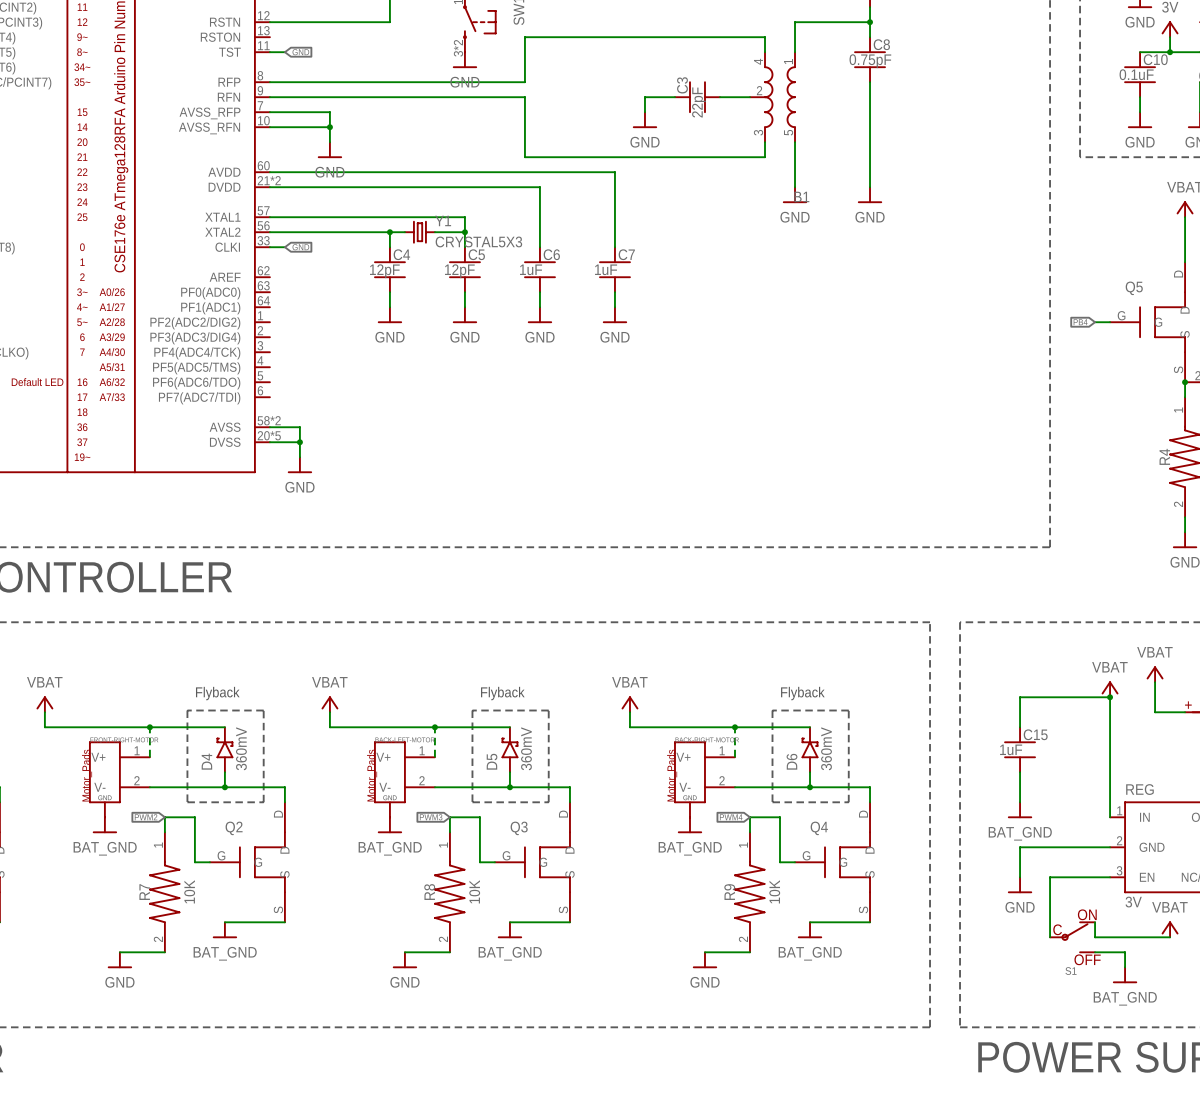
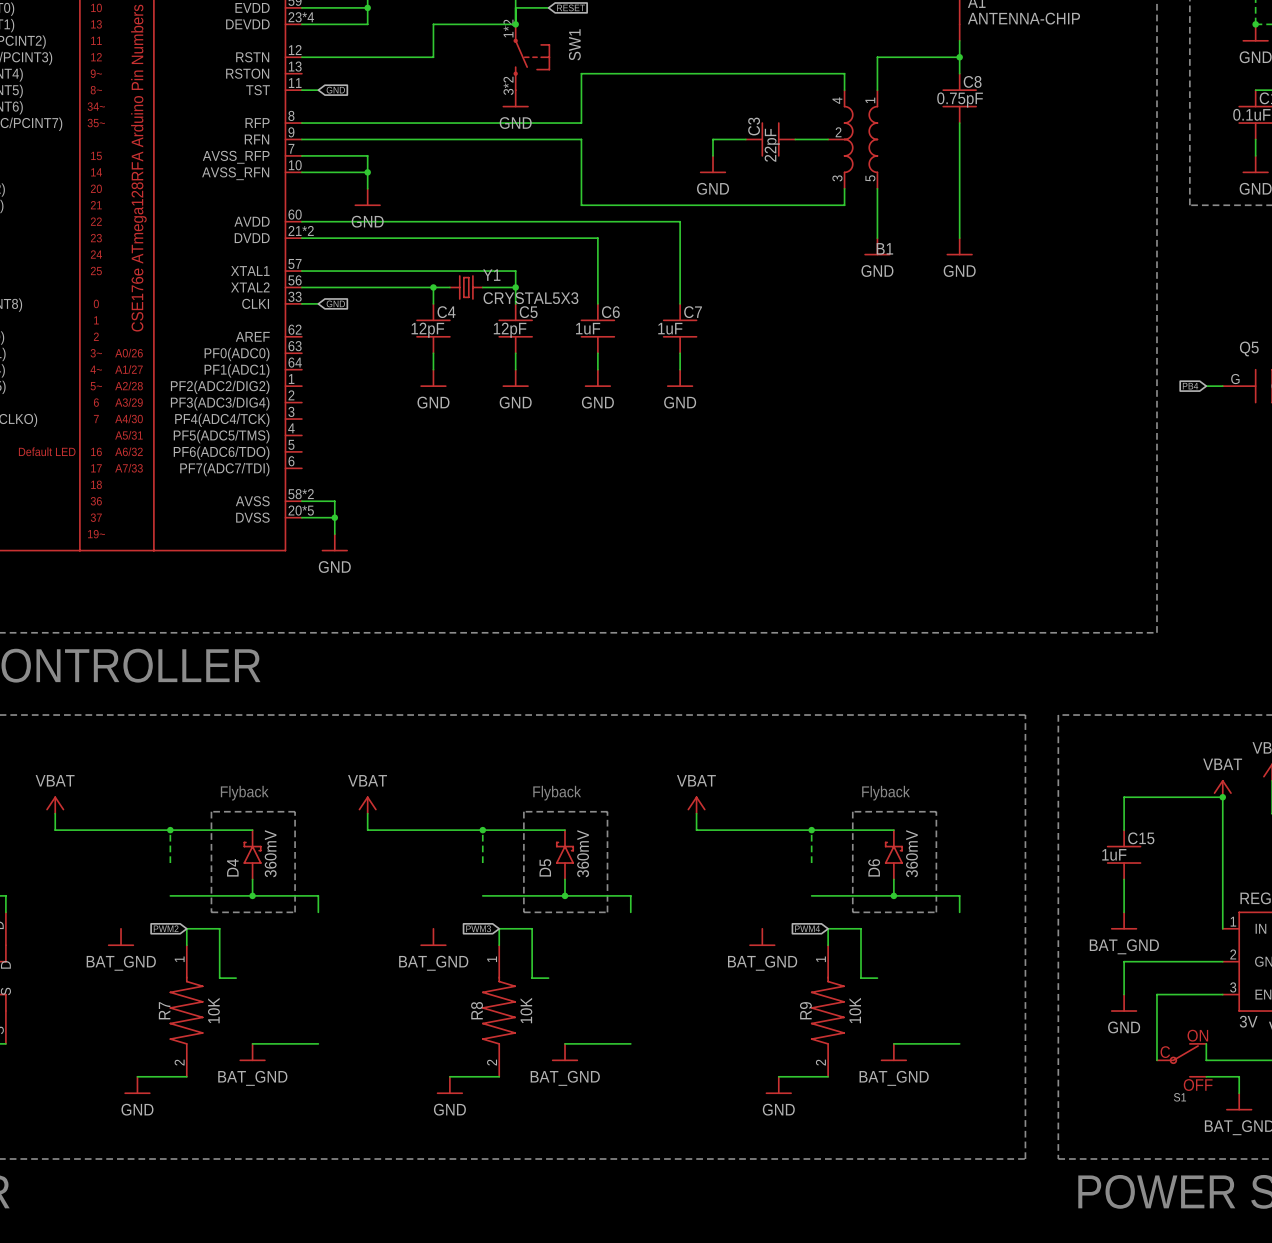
part: (119, 779) -> none
part: (404, 779) -> none
part: (704, 779) -> none
Q2: (247, 862) -> none
Q3: (532, 862) -> none
Q4: (832, 862) -> none

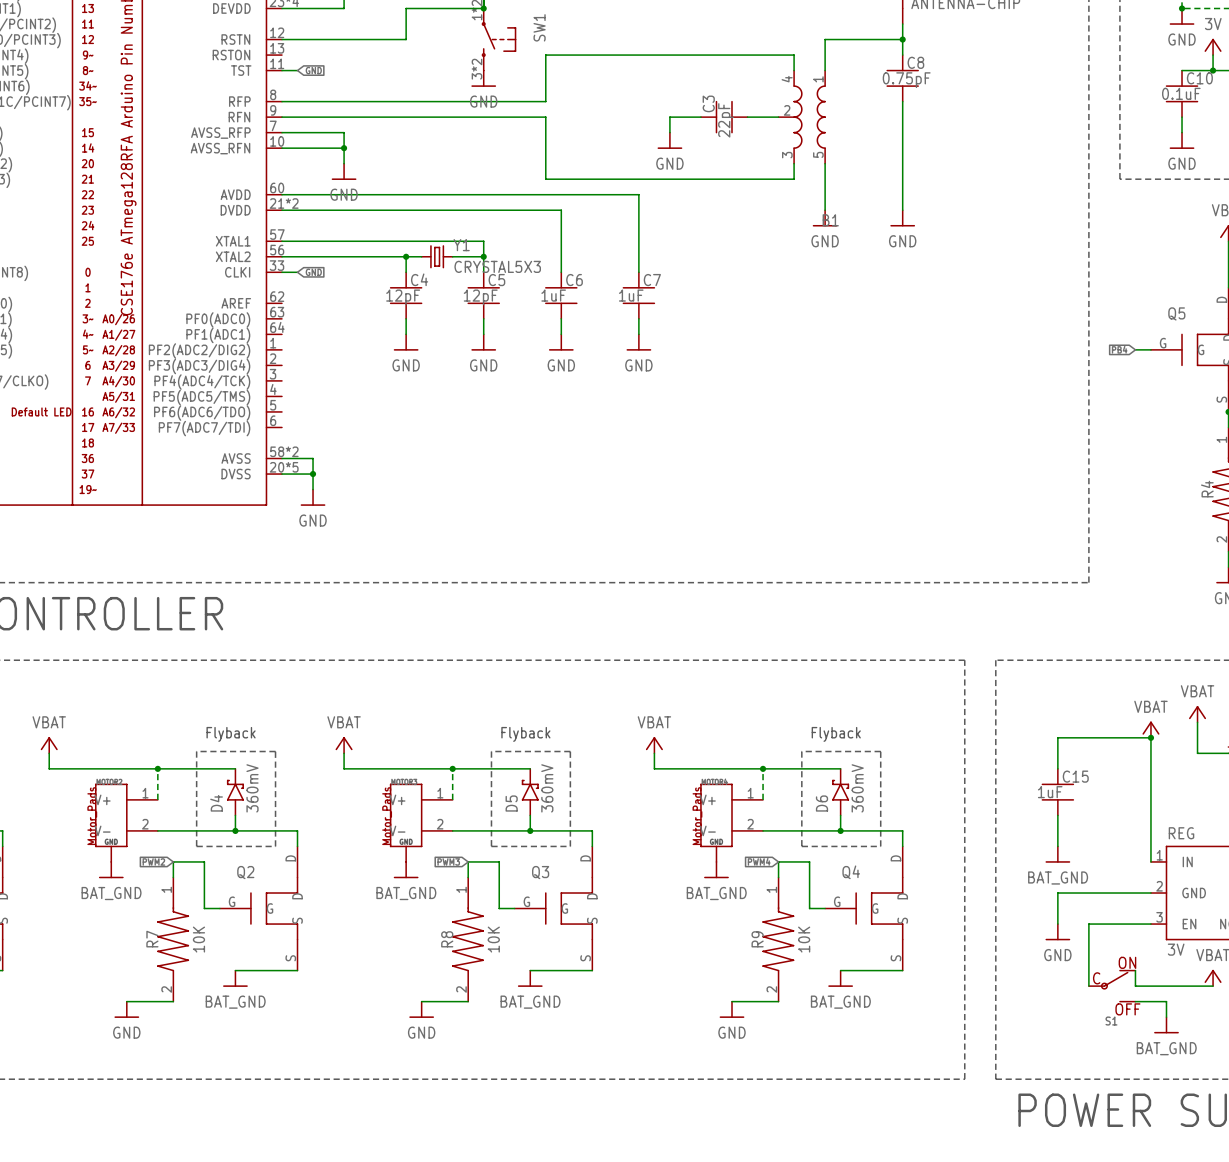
part: none -> (126, 822)
part: none -> (421, 822)
part: none -> (731, 822)
Q2: none -> (258, 908)
Q3: none -> (553, 908)
Q4: none -> (864, 908)

